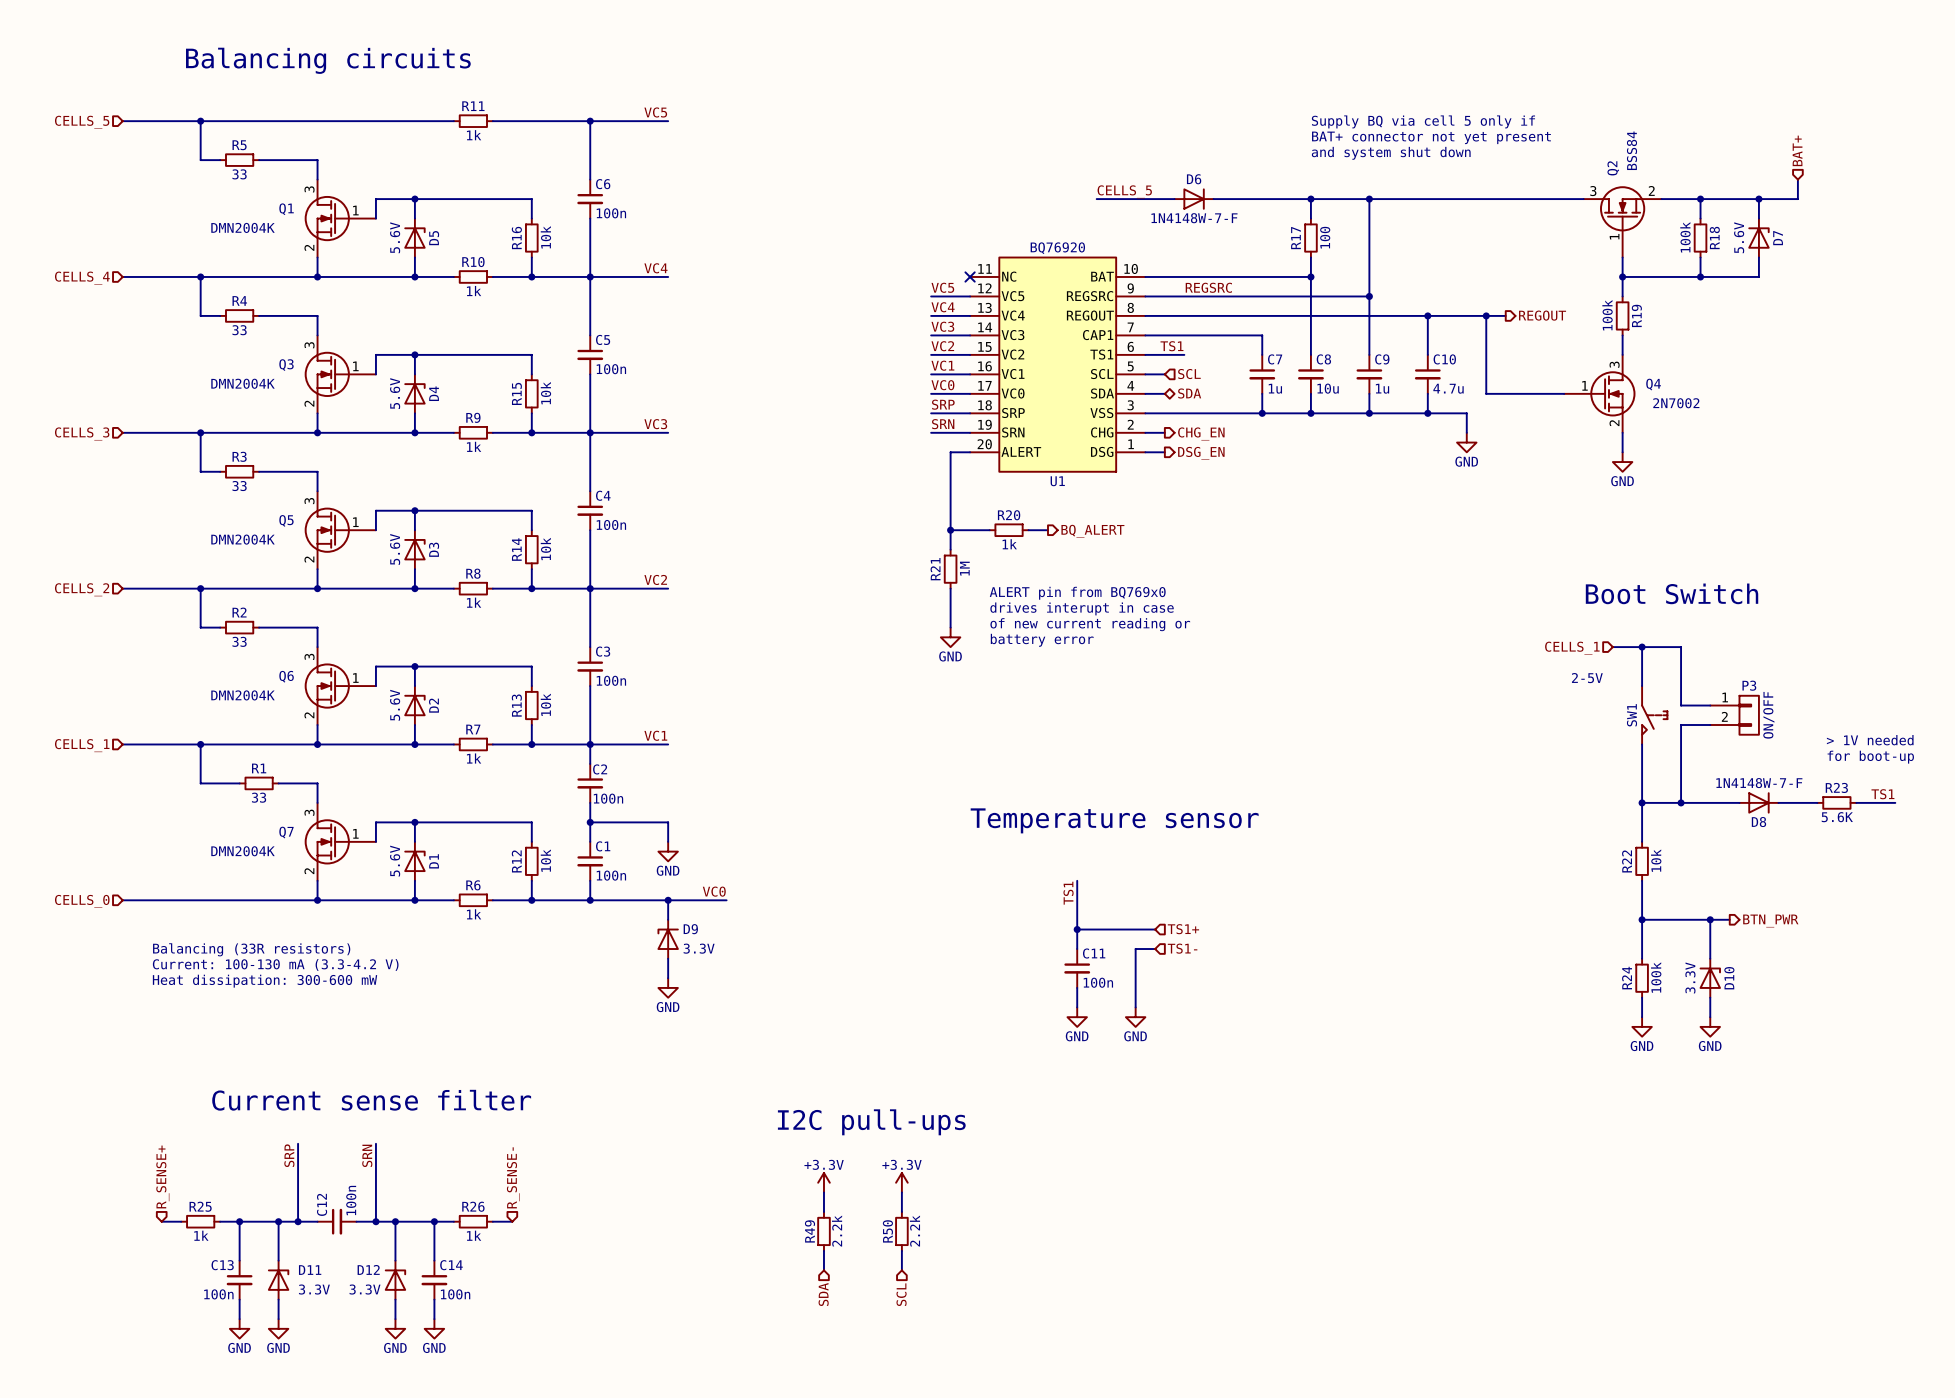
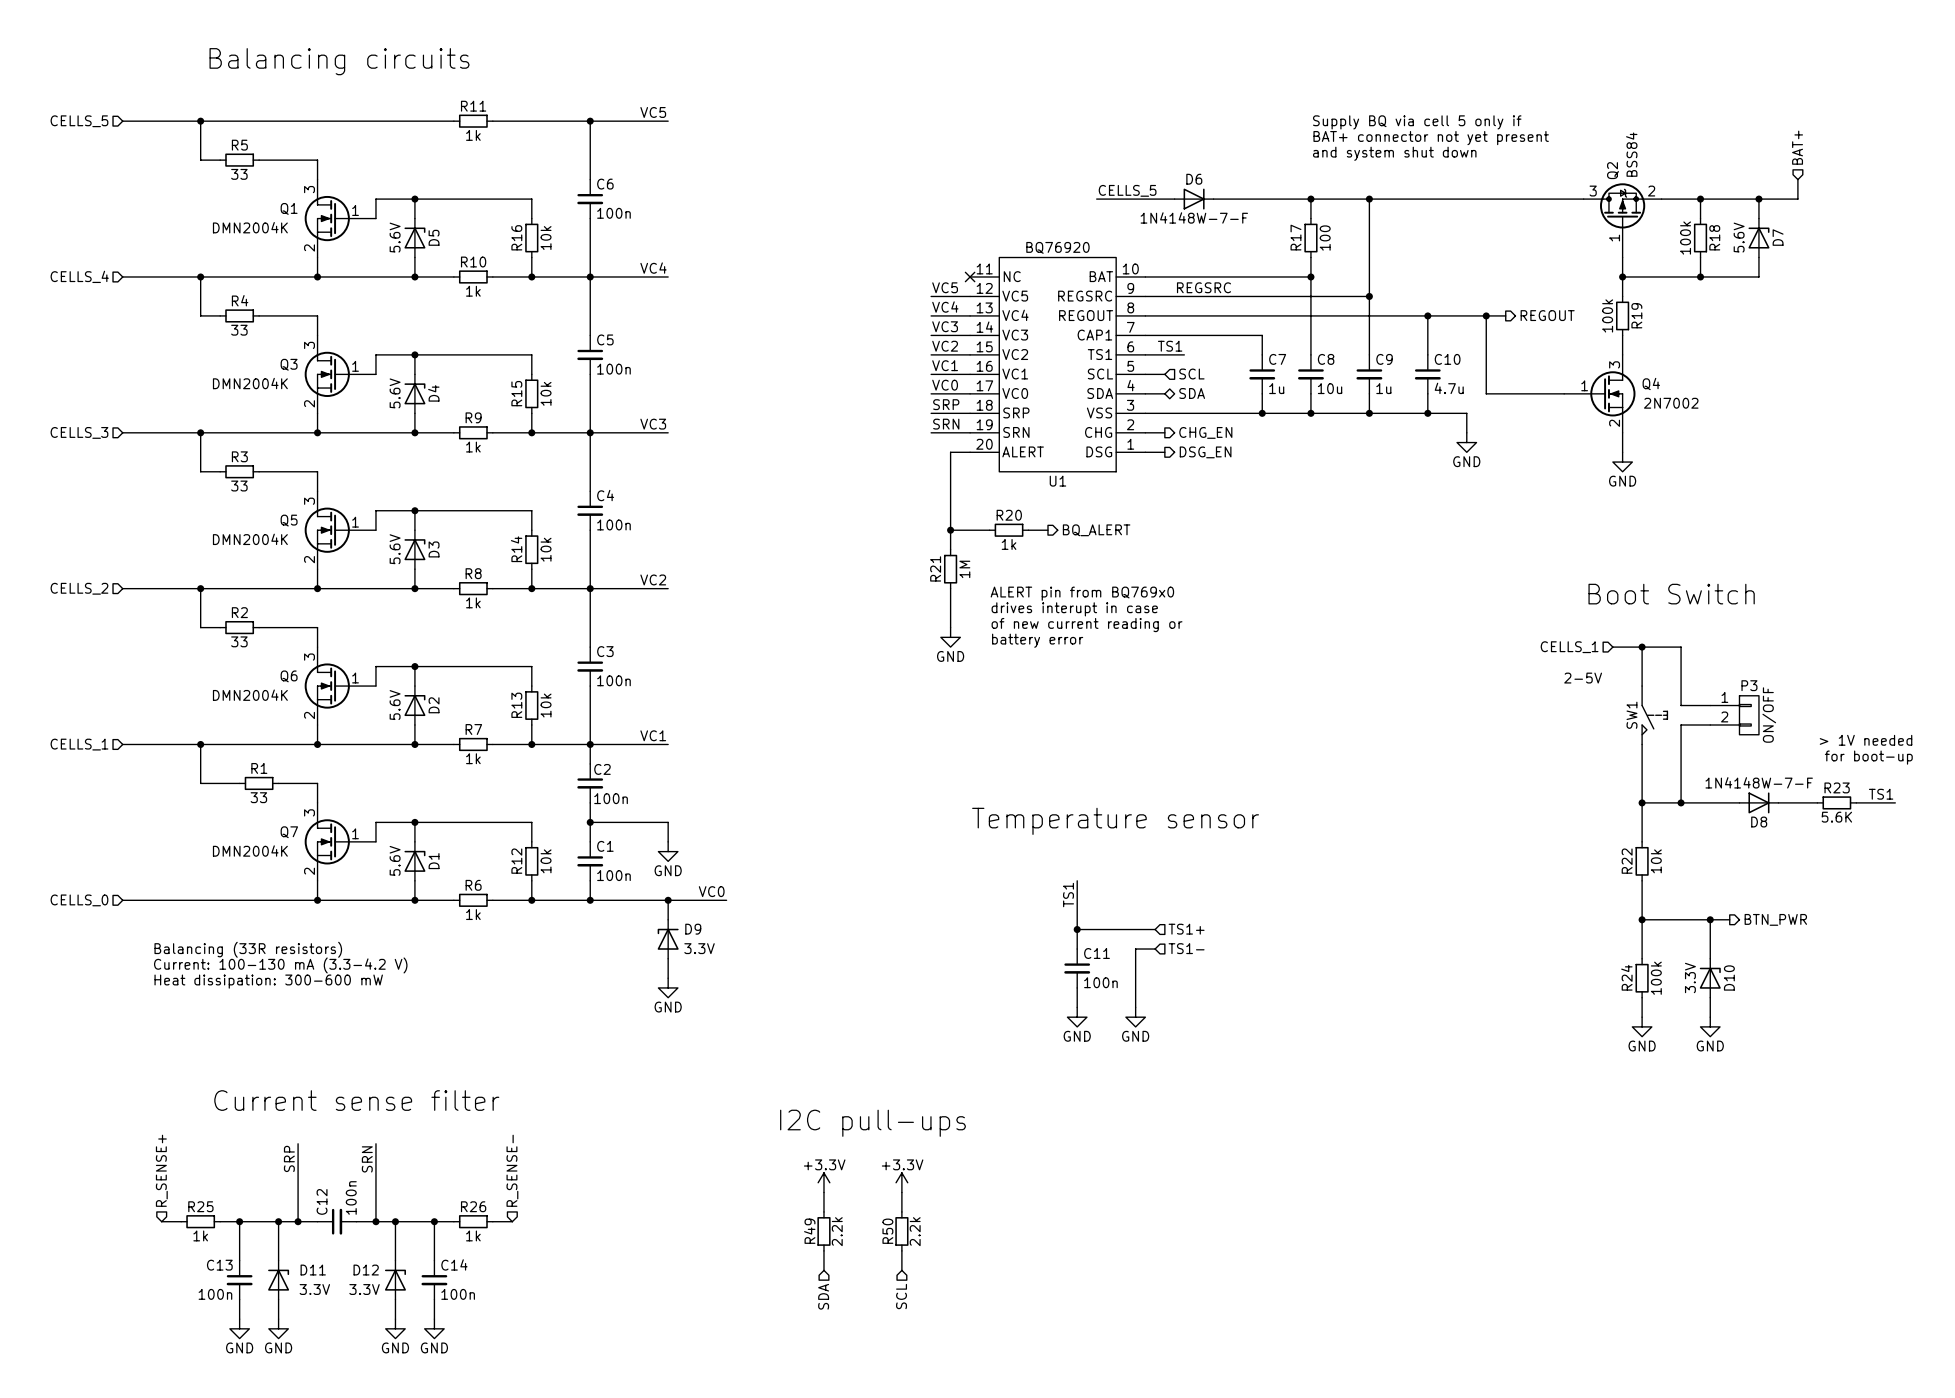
Q2 symbol: [1583, 186, 1662, 258] -> [1583, 183, 1662, 258]

